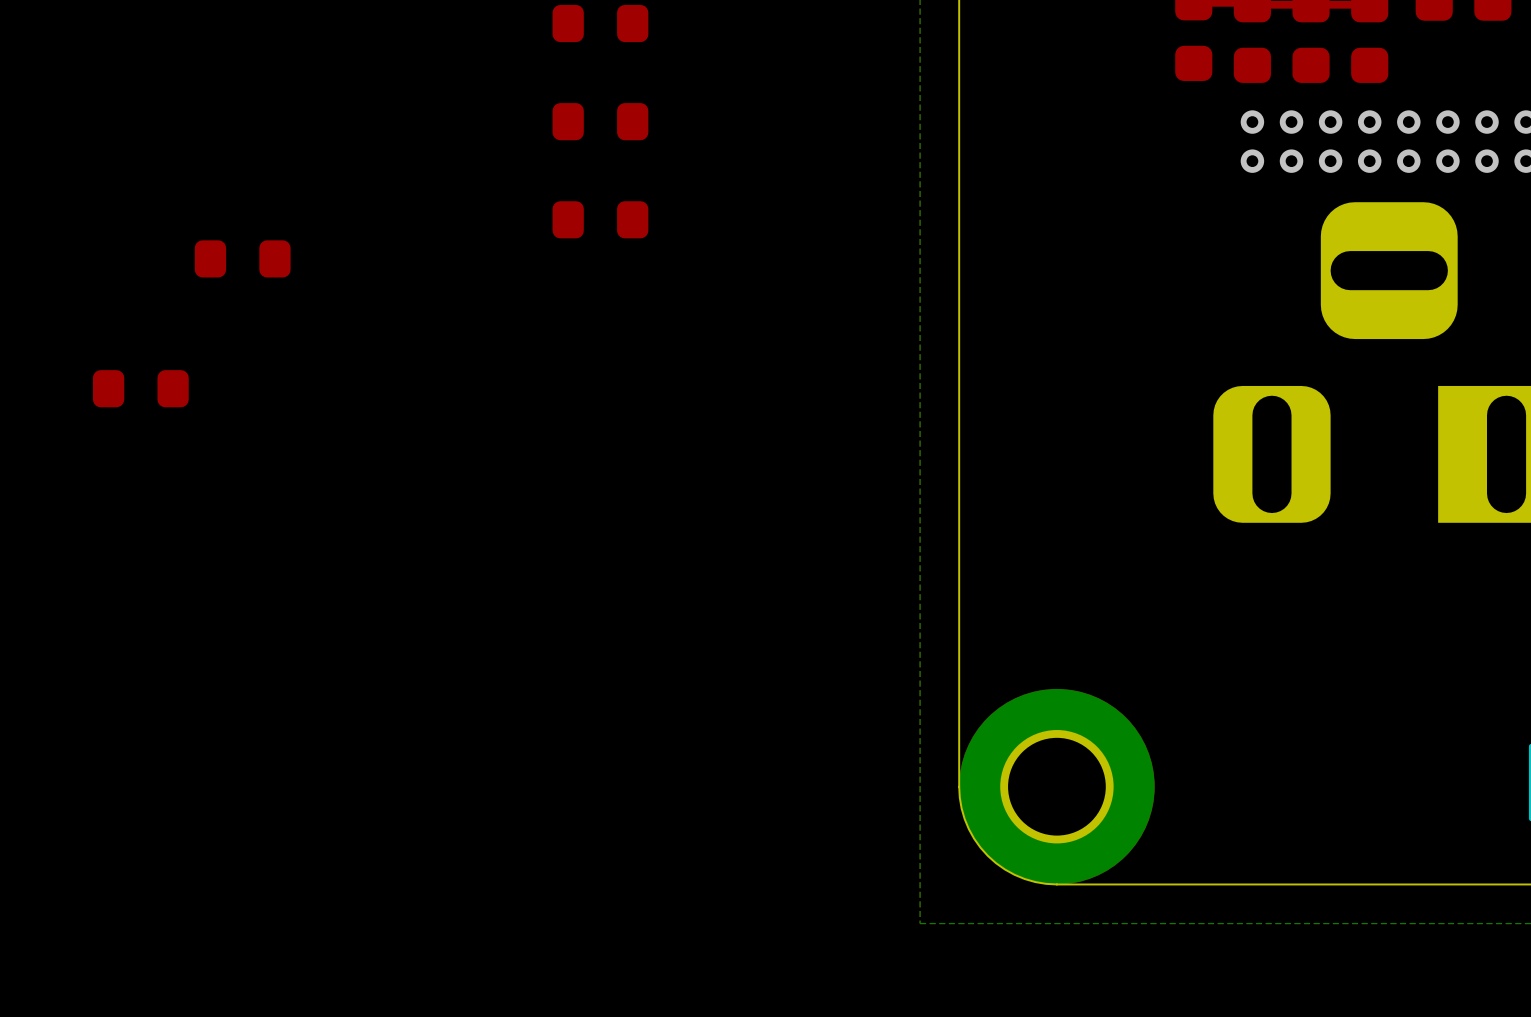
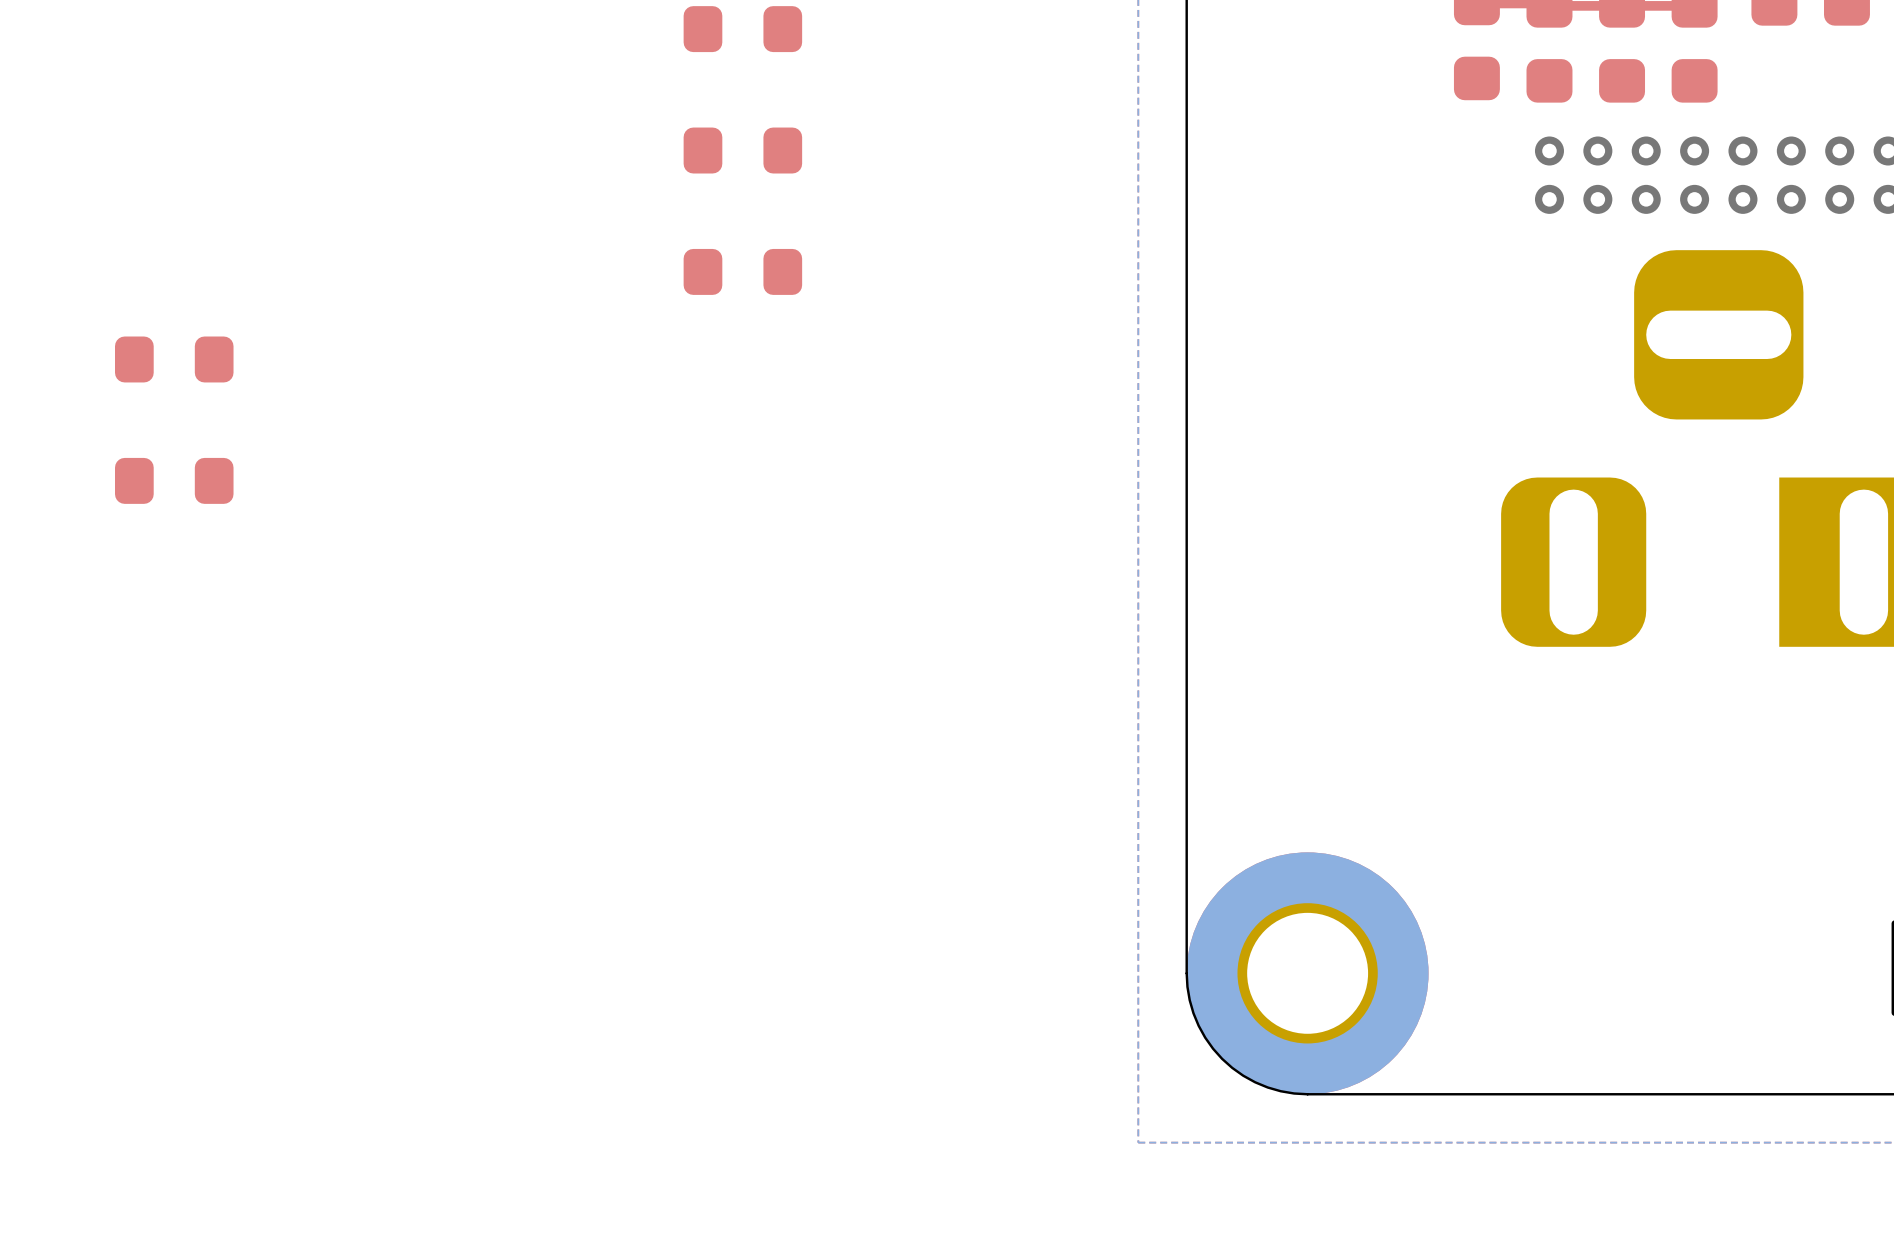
part position: (242, 258) -> (174, 359)

